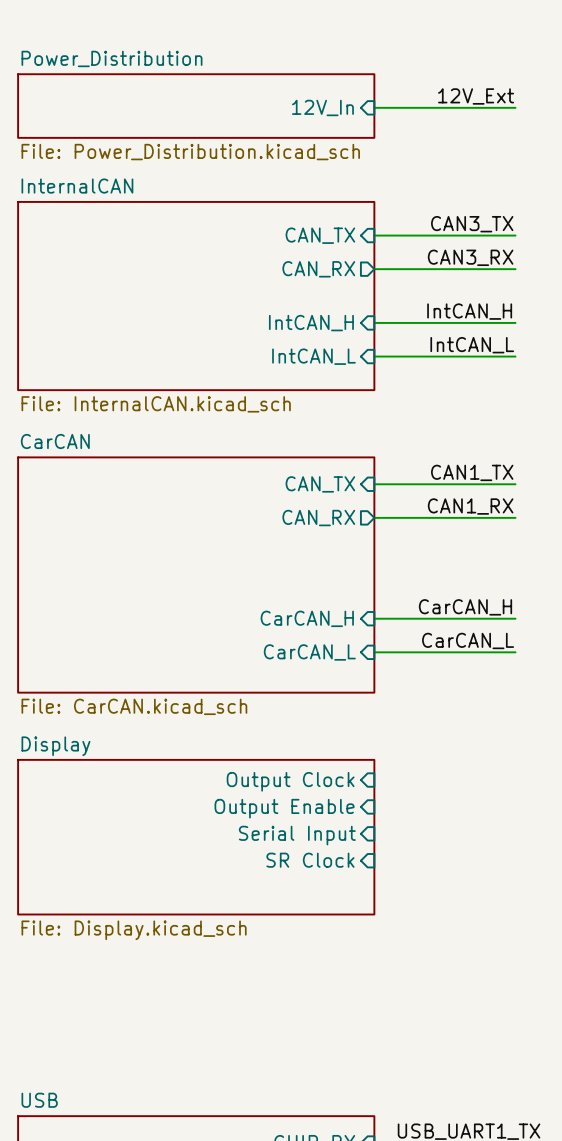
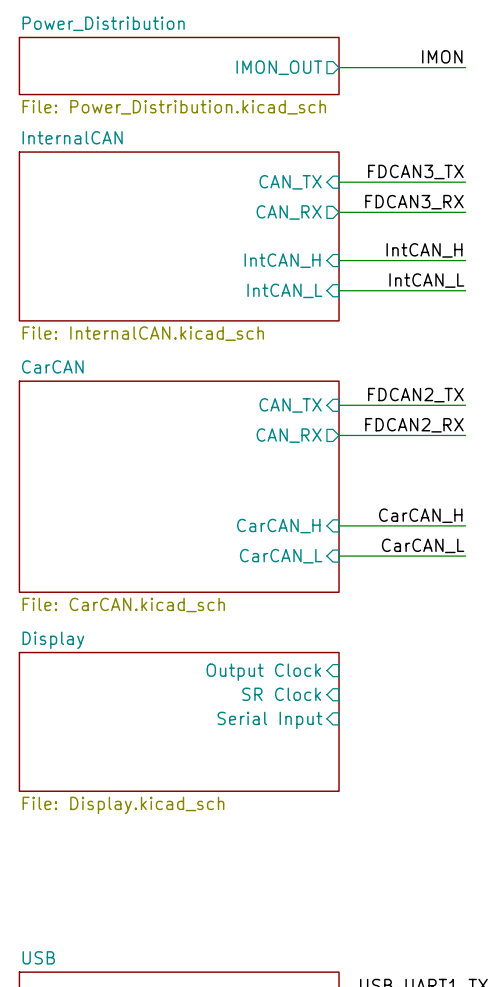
label: 12V_Ext (476, 96) -> IMON (442, 56)
sheet pin shape: input (322, 107) -> output (279, 67)
sheet pin: 12V_In (322, 107) -> IMON_OUT (279, 67)
label: CAN3_TX (472, 224) -> FDCAN3_TX (415, 172)
label: CAN3_RX (470, 257) -> FDCAN3_RX (414, 202)
label: CAN1_TX (472, 472) -> FDCAN2_TX (415, 395)
label: CAN1_RX (470, 506) -> FDCAN2_RX (414, 425)
sheet pin: Output Enable (284, 808) -> SR Clock (281, 694)
sheet pin: SR Clock (310, 860) -> none

